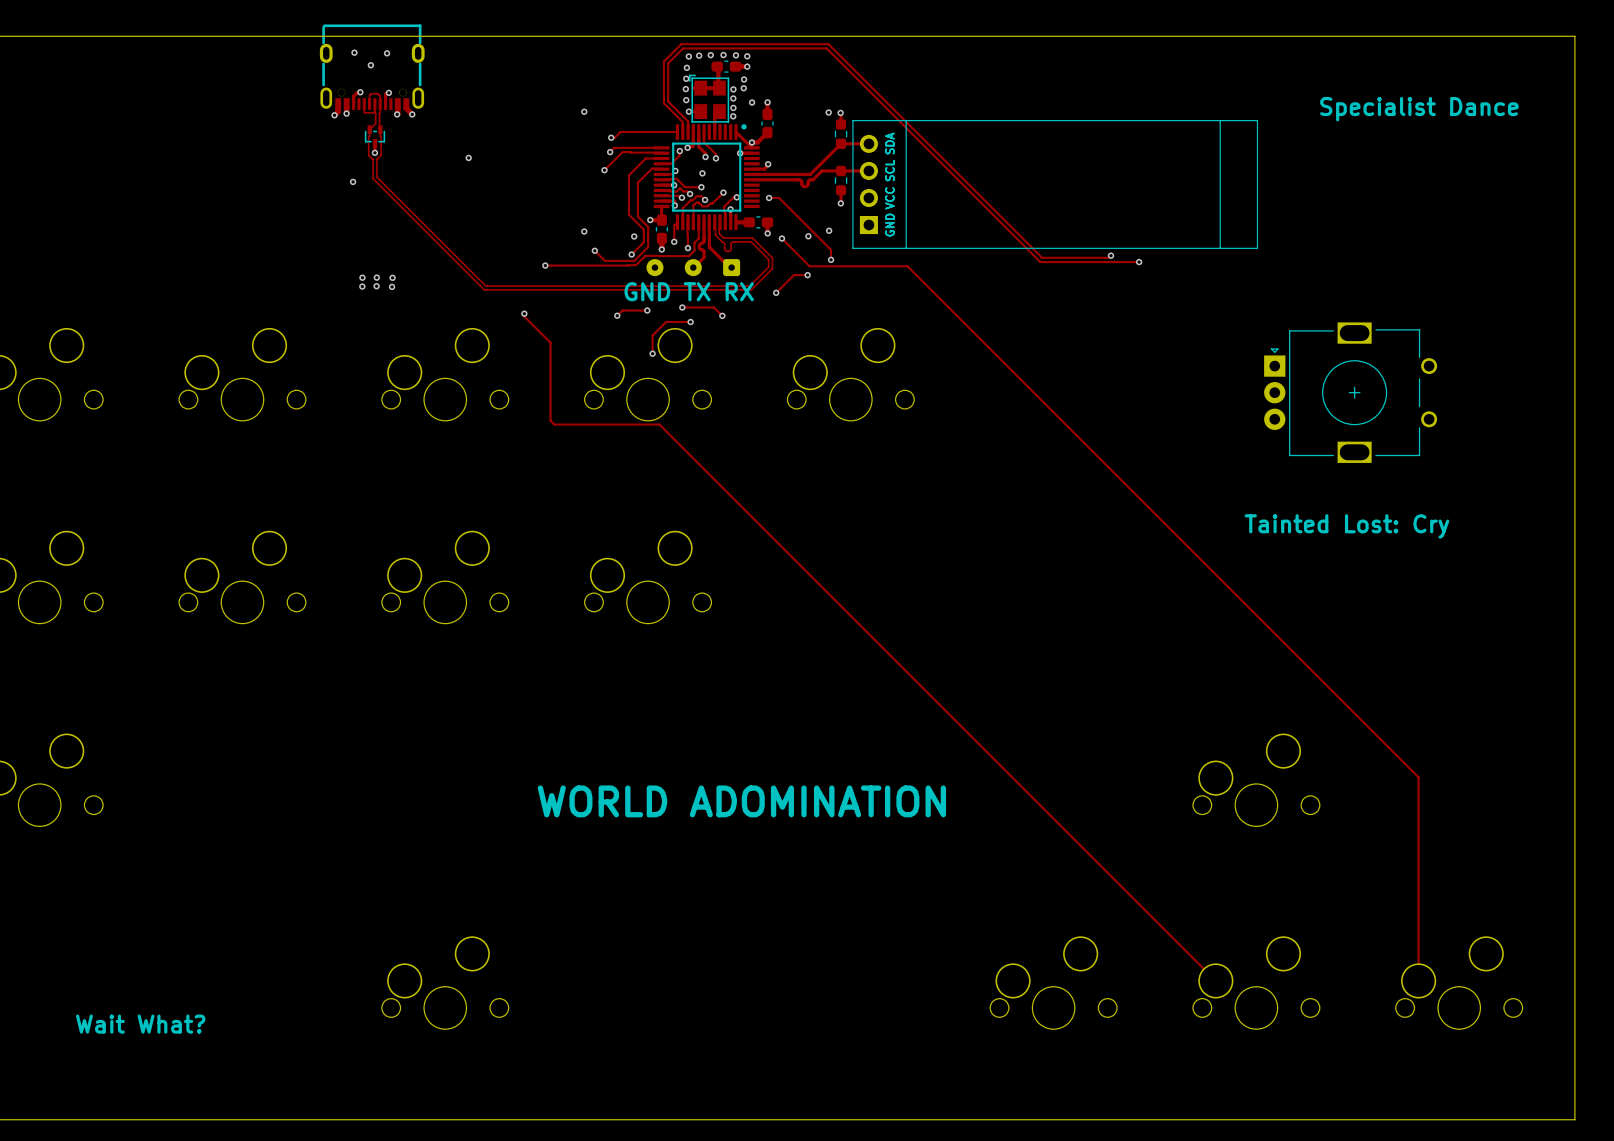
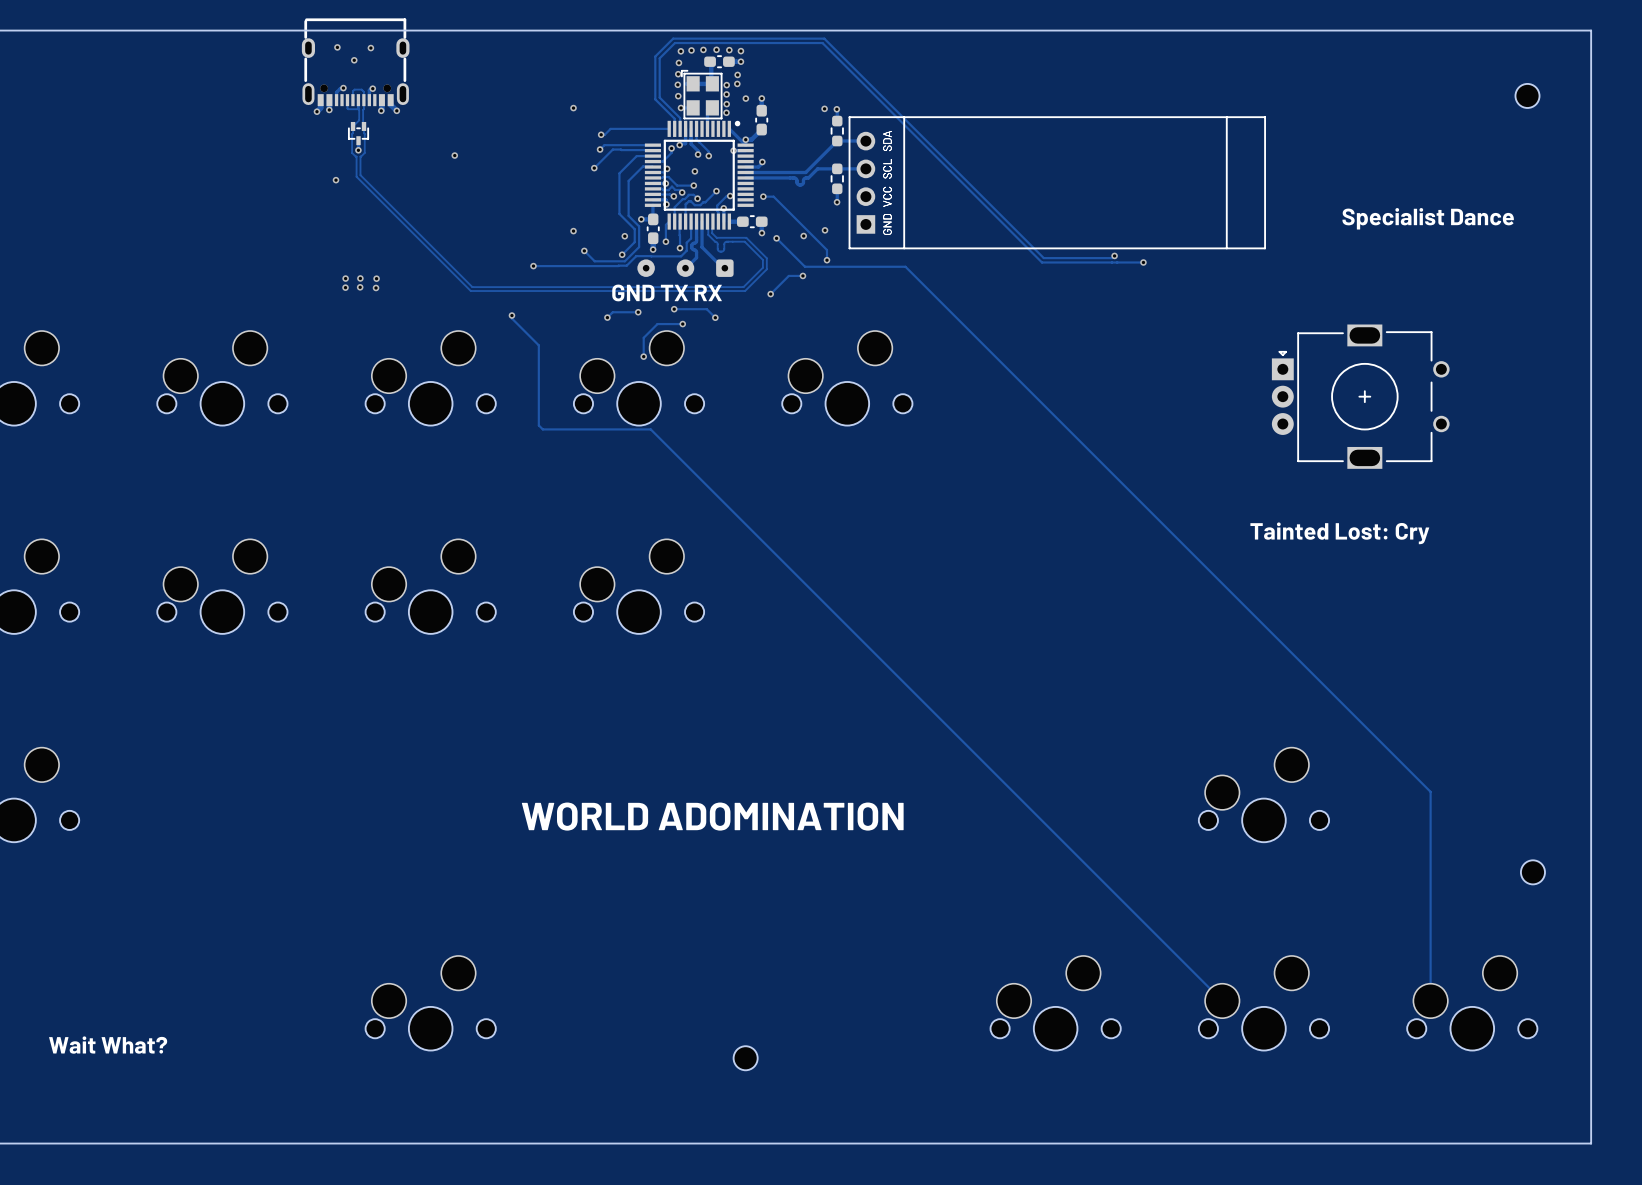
part: none -> (1527, 95)
text position: Specialist Dance (1419, 109) -> Specialist Dance (1428, 218)
part: none -> (1532, 872)
part: none -> (745, 1058)

